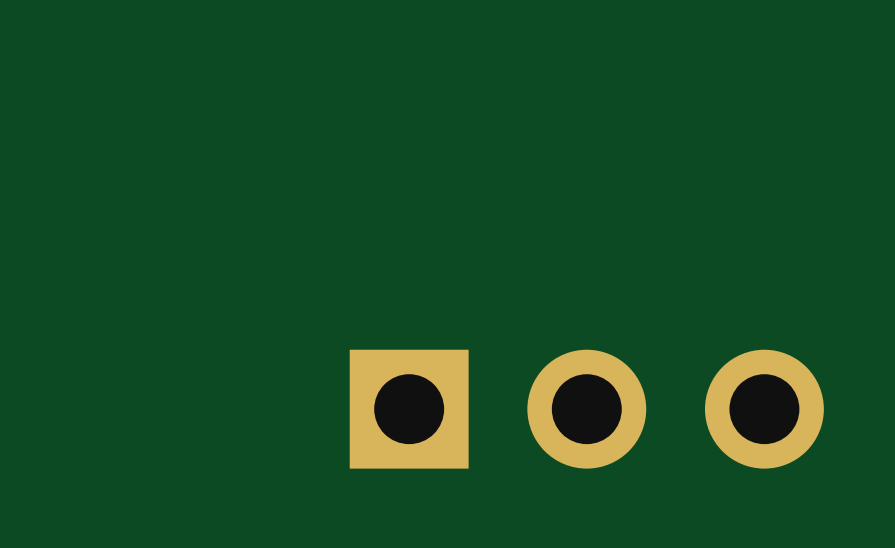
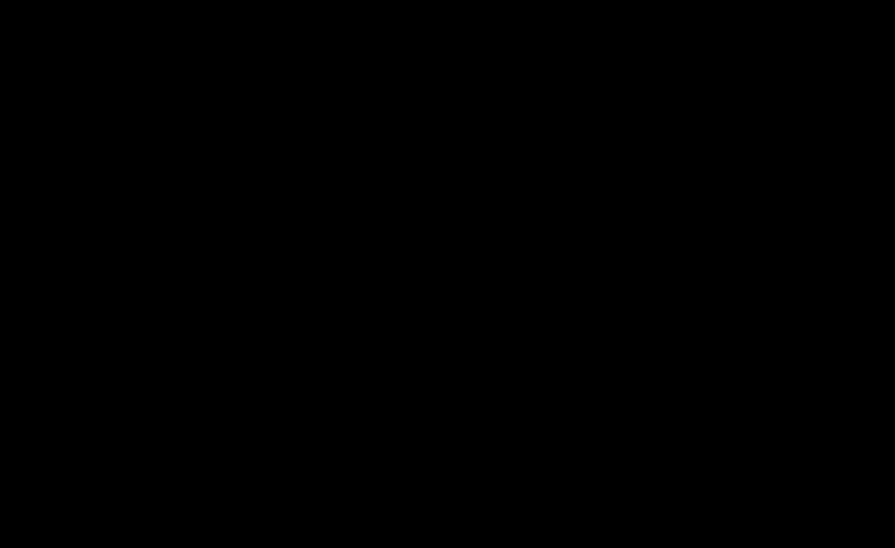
part: (586, 409) -> none

